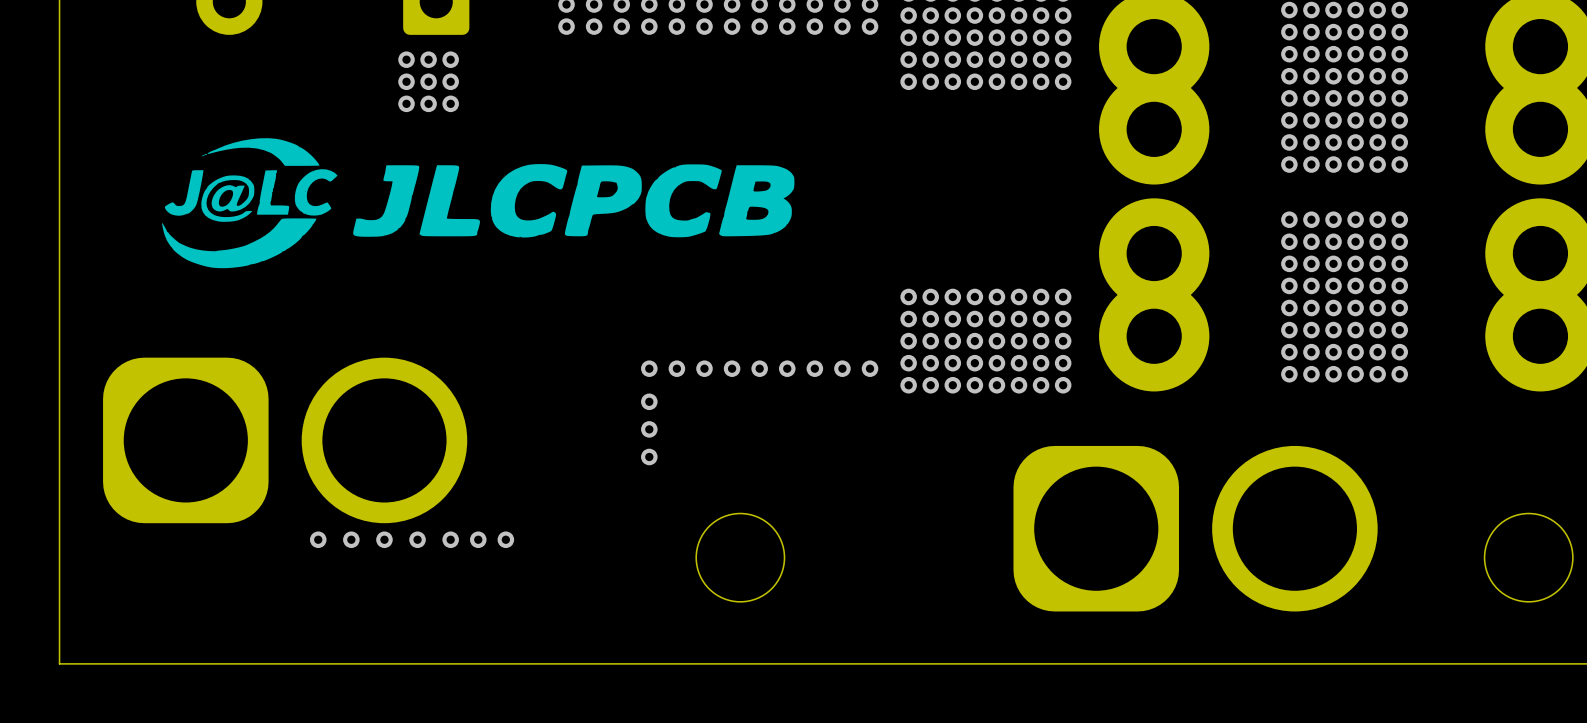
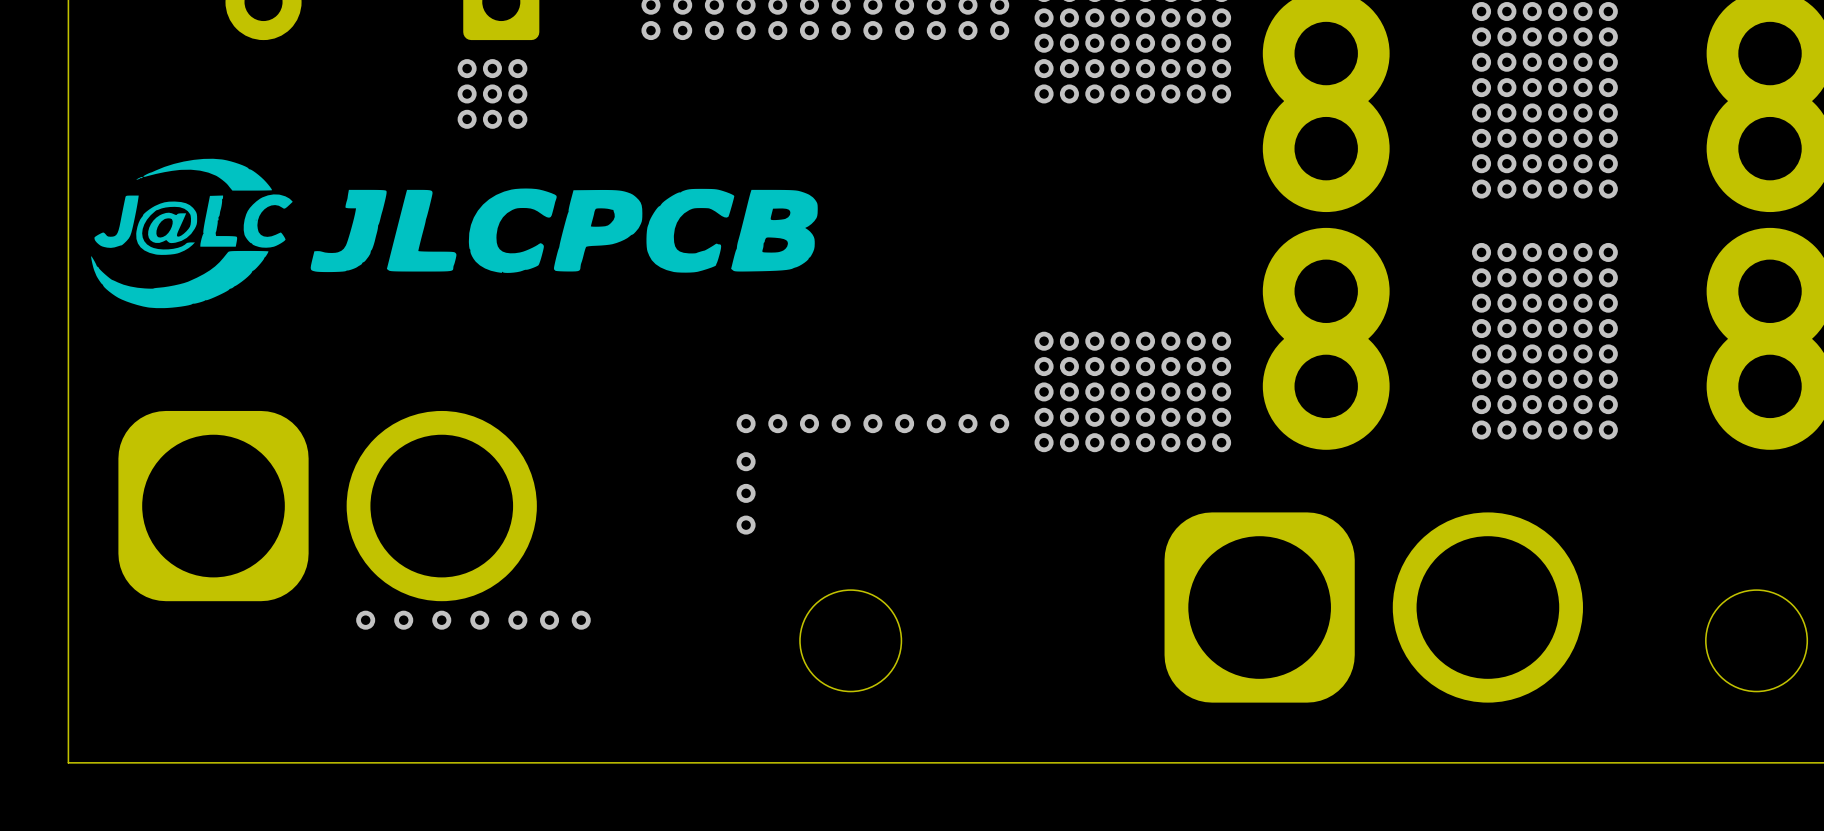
drawing position: (478, 203) -> (454, 233)

